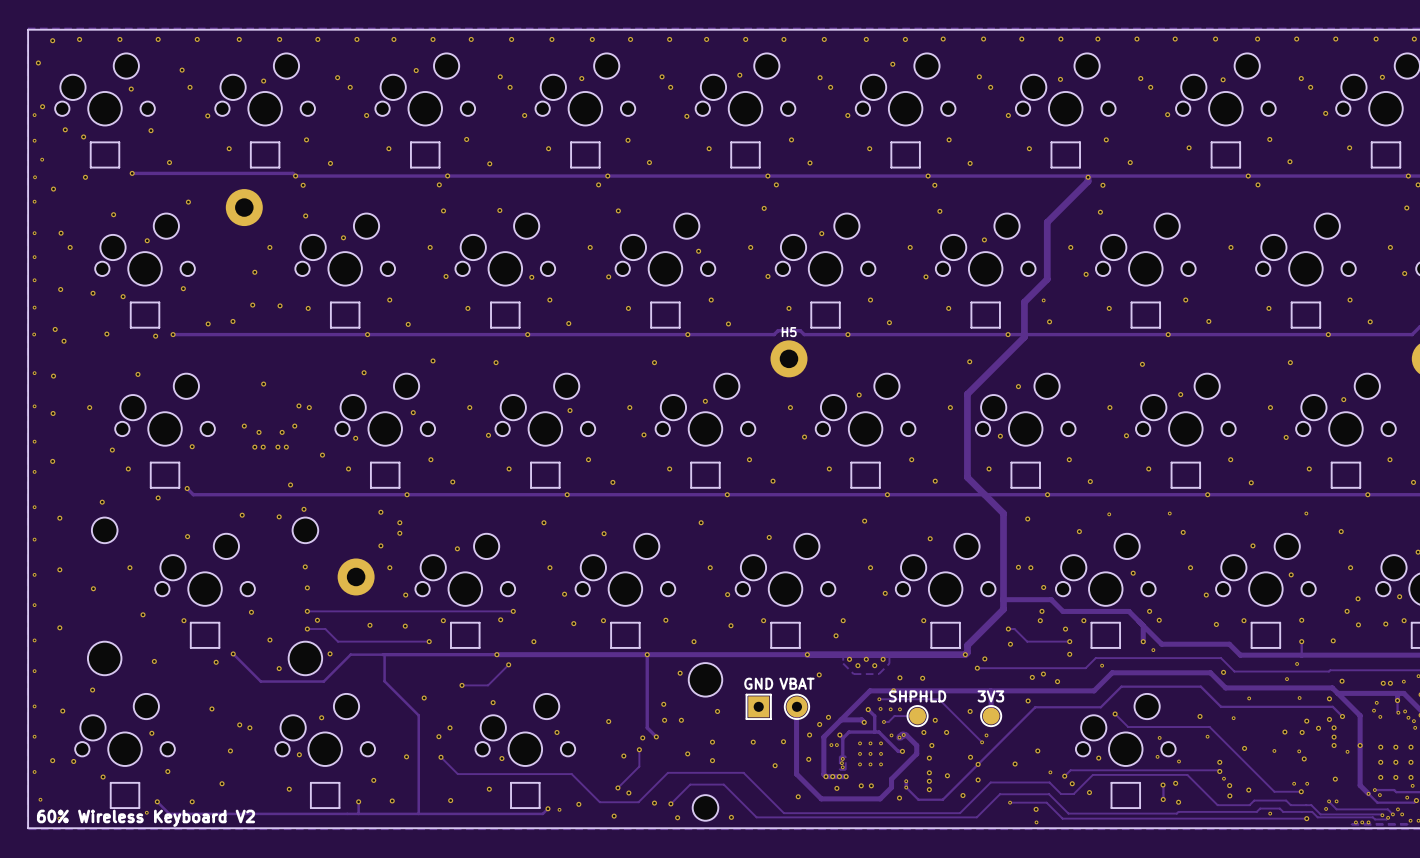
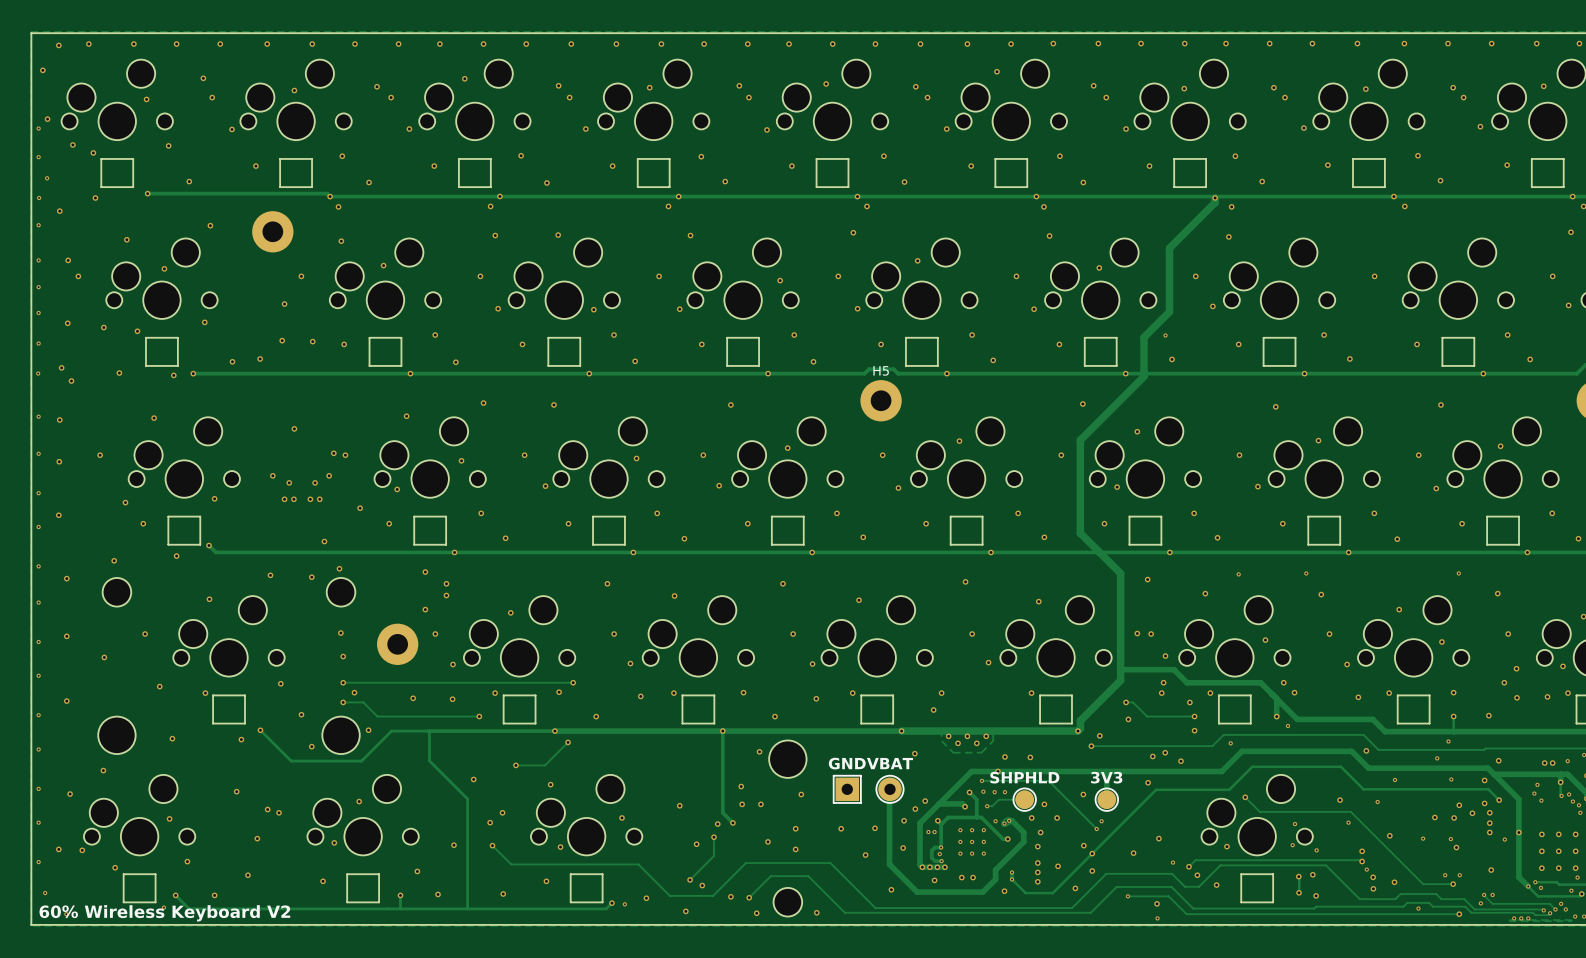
zone outline: (839, 756) (845, 756) (845, 769) (839, 769) (839, 756) -> none
track: none -> (941, 847) (935, 847) (931, 850) (931, 857) (935, 861) (941, 861)
via: (841, 763) -> none
via: none -> (939, 854)
via: (842, 767) -> none
via: none -> (941, 861)

